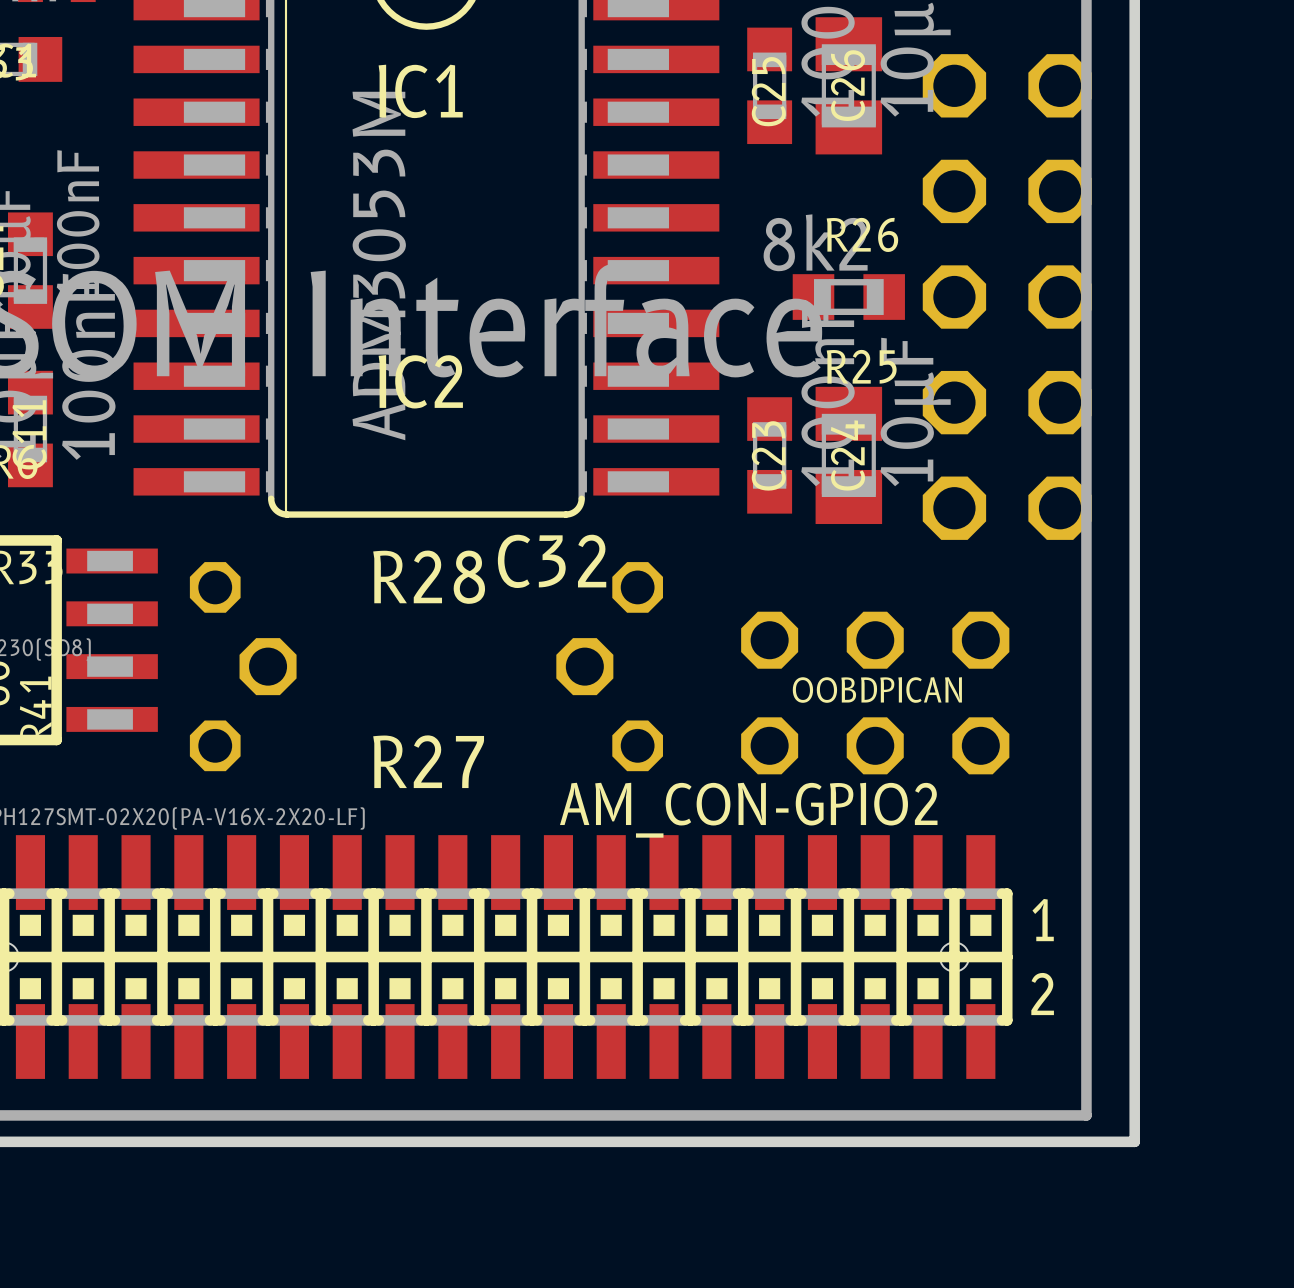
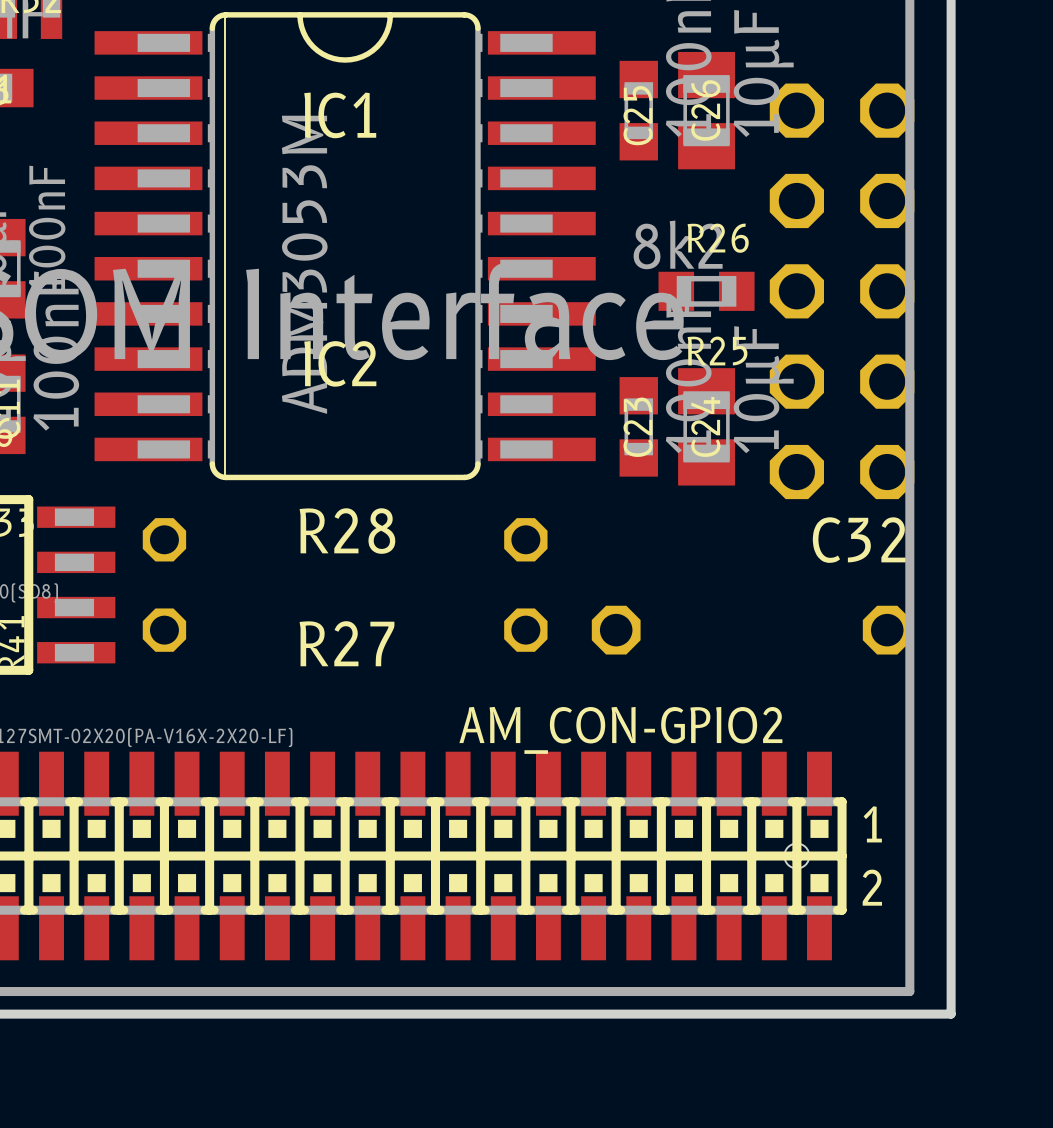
C32 position: (426, 666) -> (751, 630)
OOBDPICAN: (875, 693) -> none
R27 position: (426, 745) -> (345, 630)

